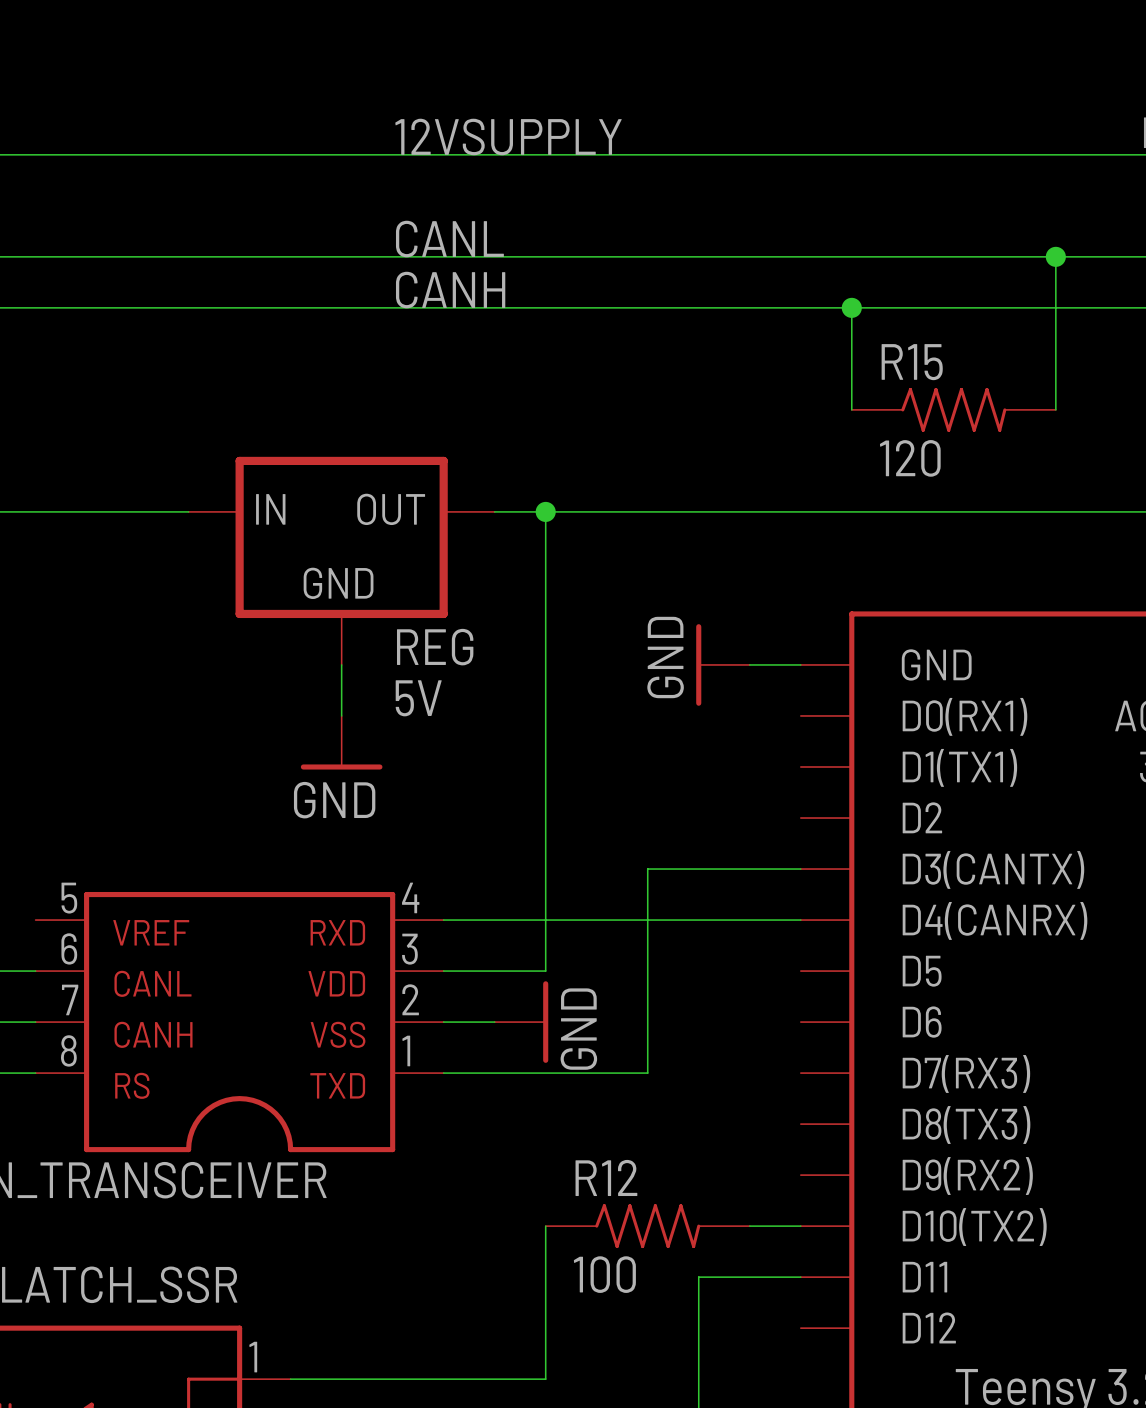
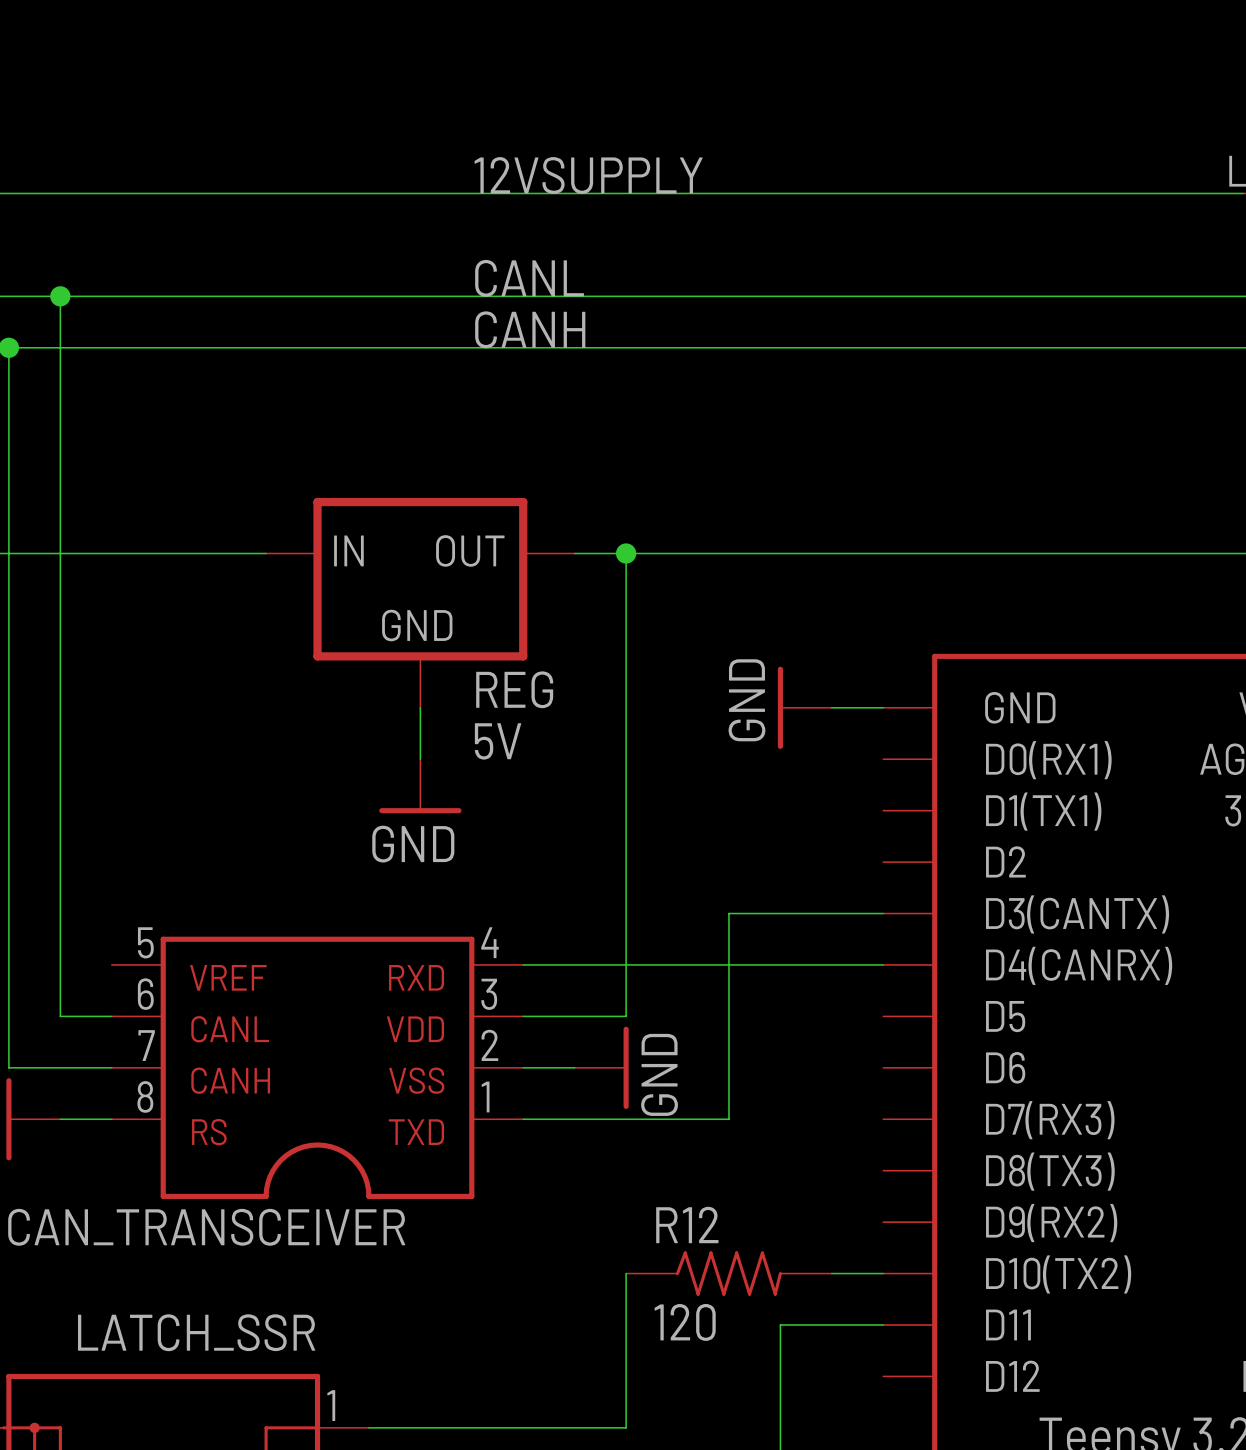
wire: (1055, 256) (1055, 409) -> none
junction: (1055, 256) -> none
wire: (851, 307) (851, 409) -> none
junction: (851, 307) -> none
R15: 120 (953, 409) -> none
R12 value: 100 (604, 1274) -> 120 (685, 1322)

